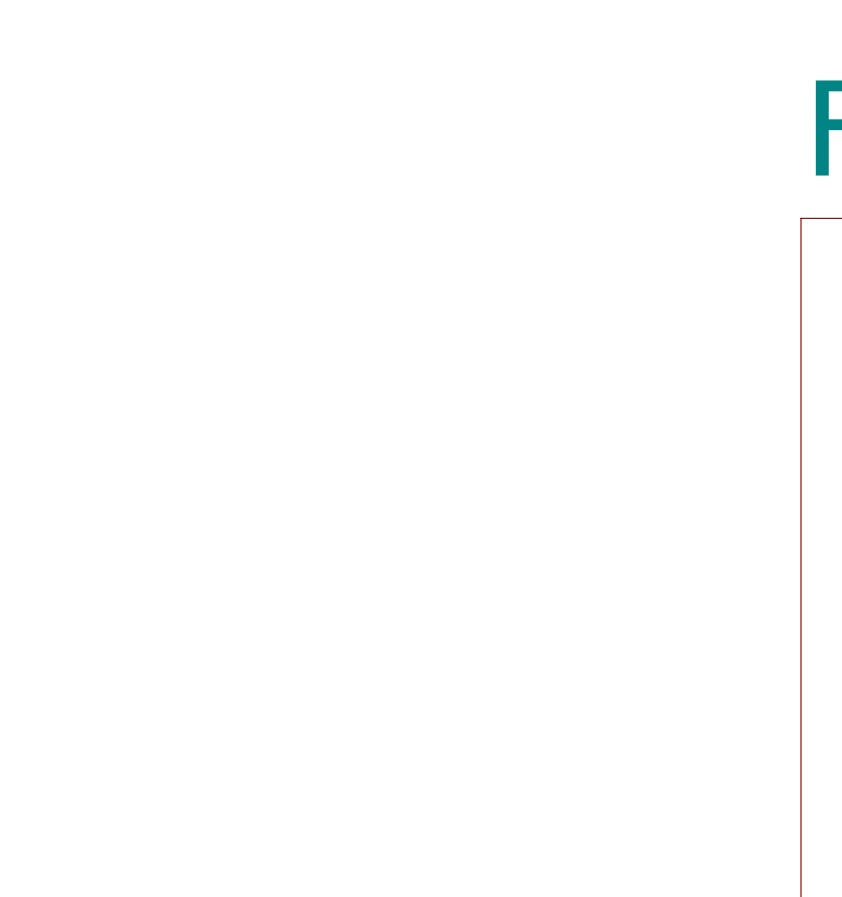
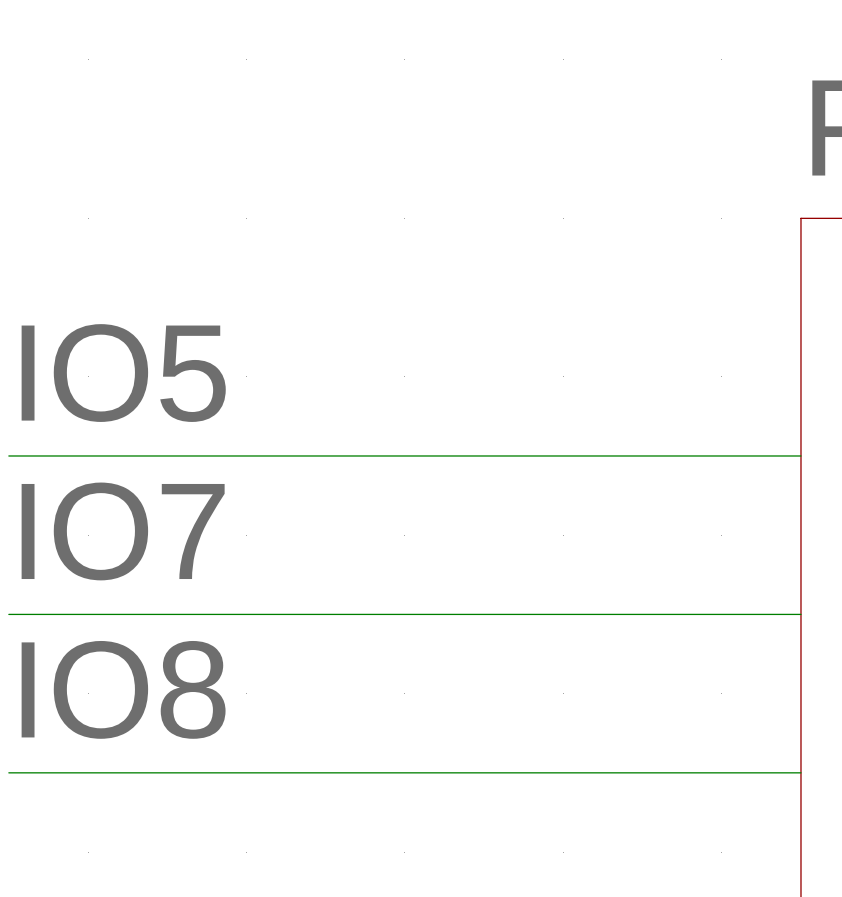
label: none -> IO5 (123, 373)
wire: none -> (8, 455) (800, 455)
label: none -> IO7 (123, 531)
wire: none -> (8, 614) (800, 614)
label: none -> IO8 (123, 689)
wire: none -> (8, 772) (800, 772)

